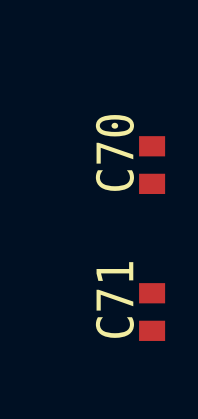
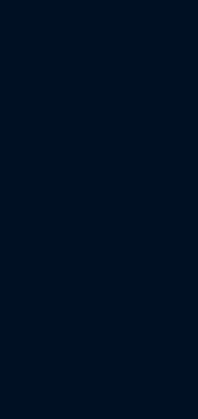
C70: (152, 165) -> none
C71: (152, 312) -> none

